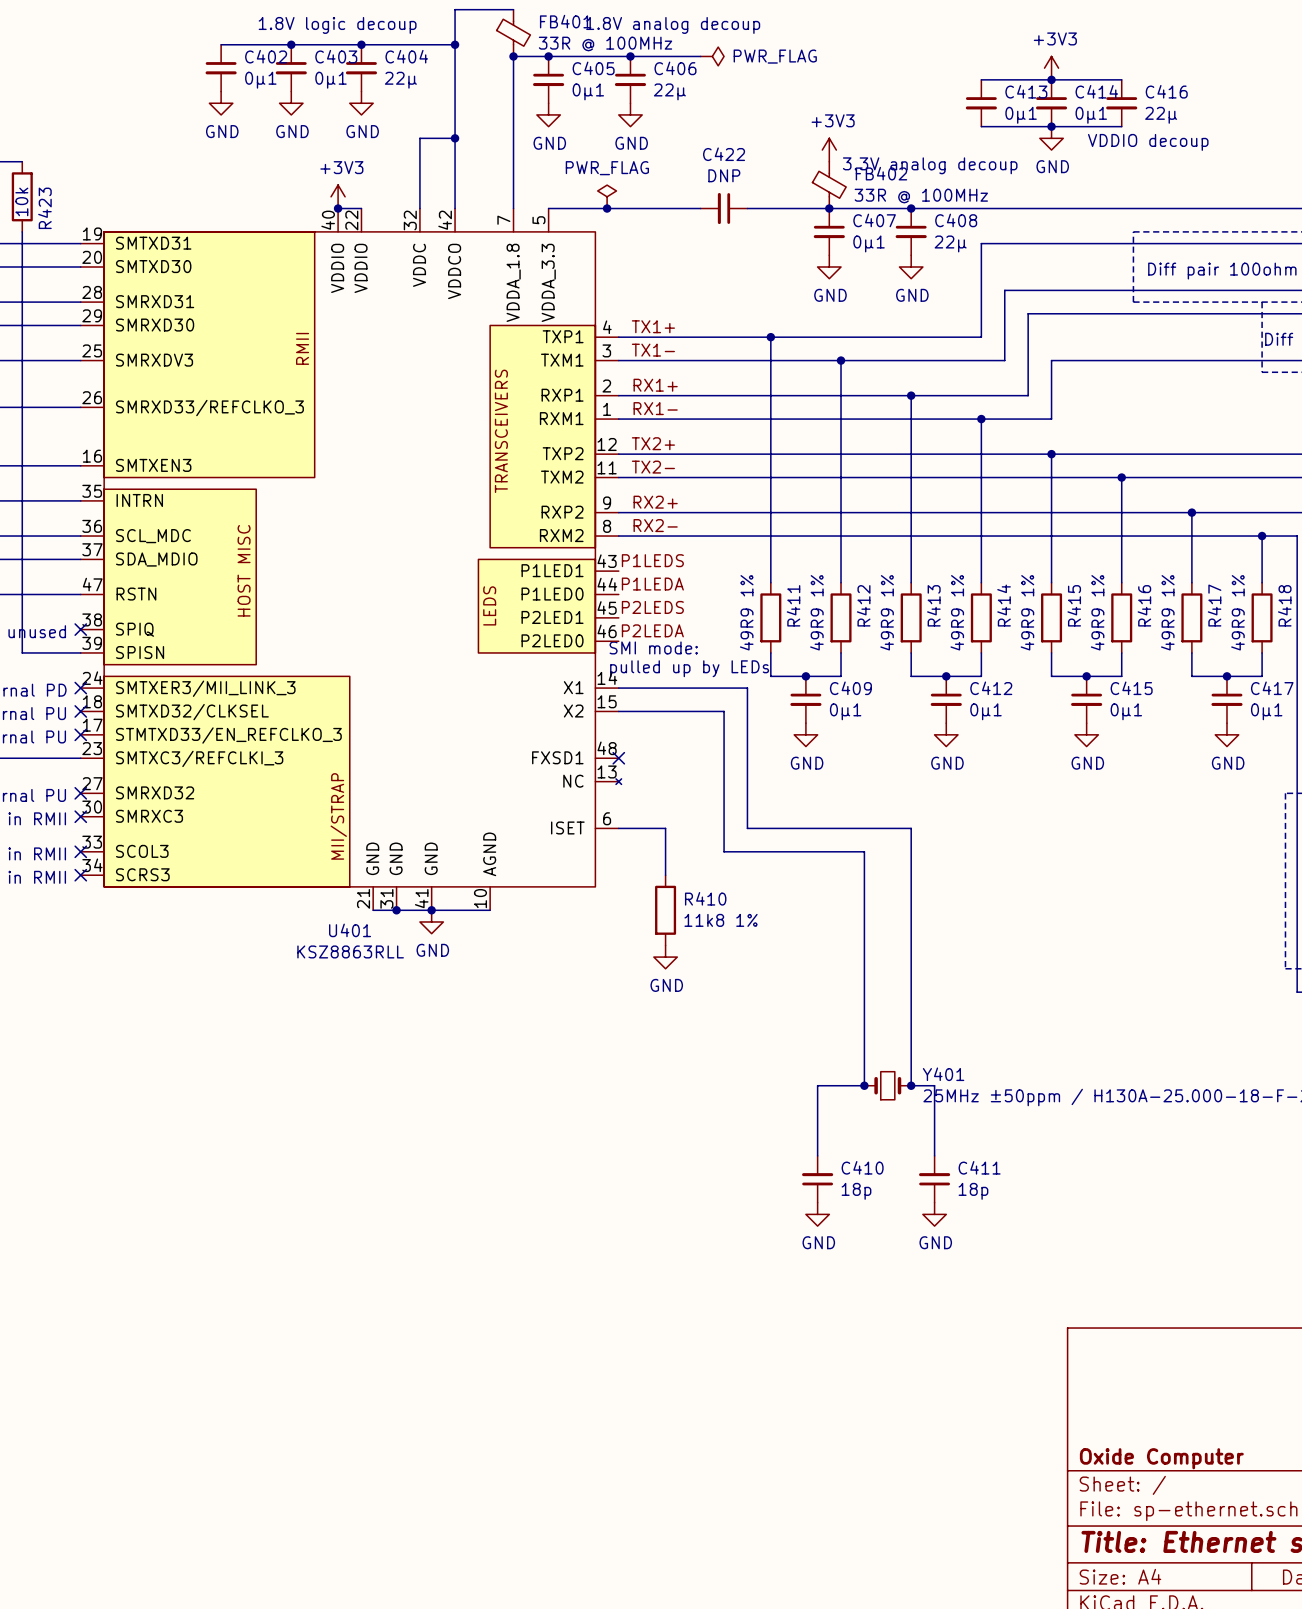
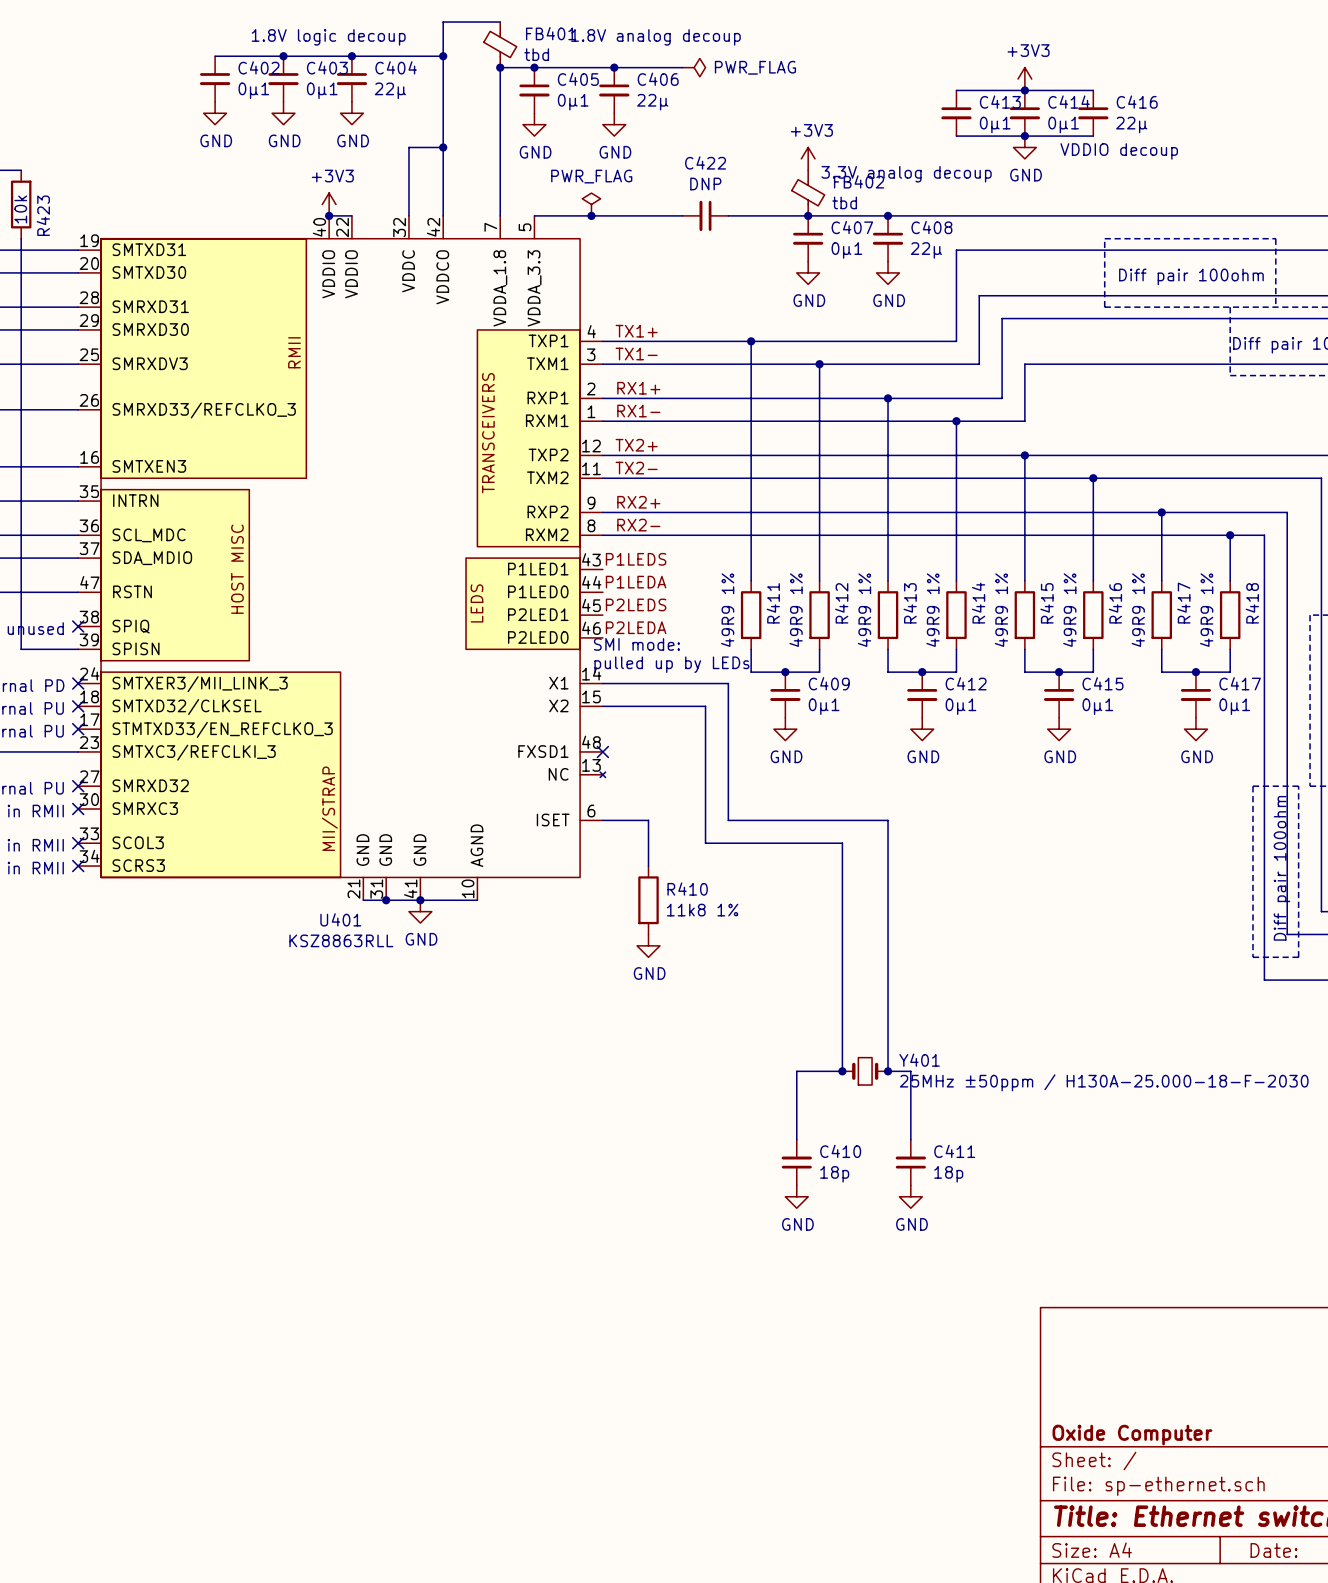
FB401 value: 33R @ 100MHz (605, 44) -> tbd (536, 54)
FB402 value: 33R @ 100MHz (921, 196) -> tbd (844, 202)

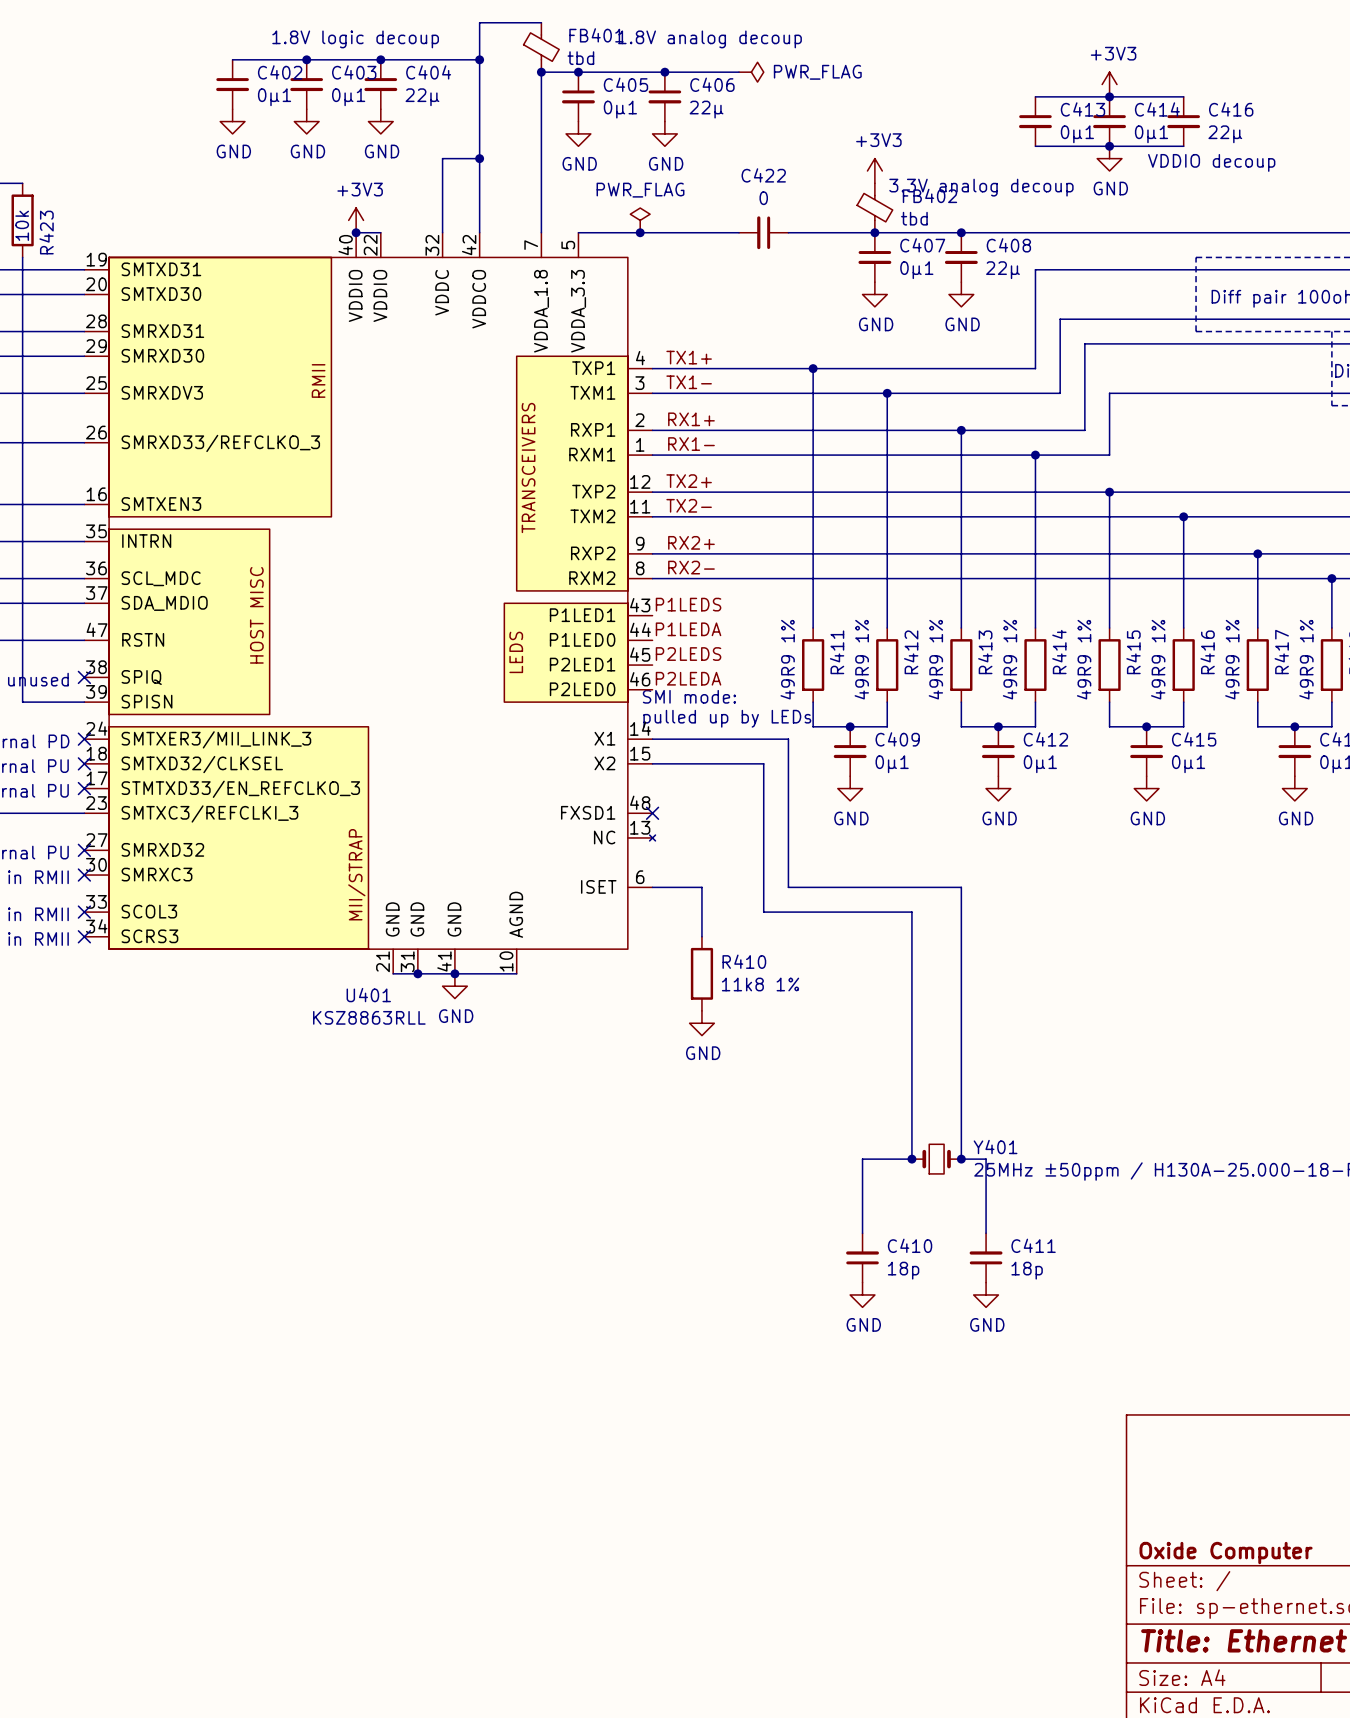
C422 value: DNP (705, 184) -> 0 (763, 198)

